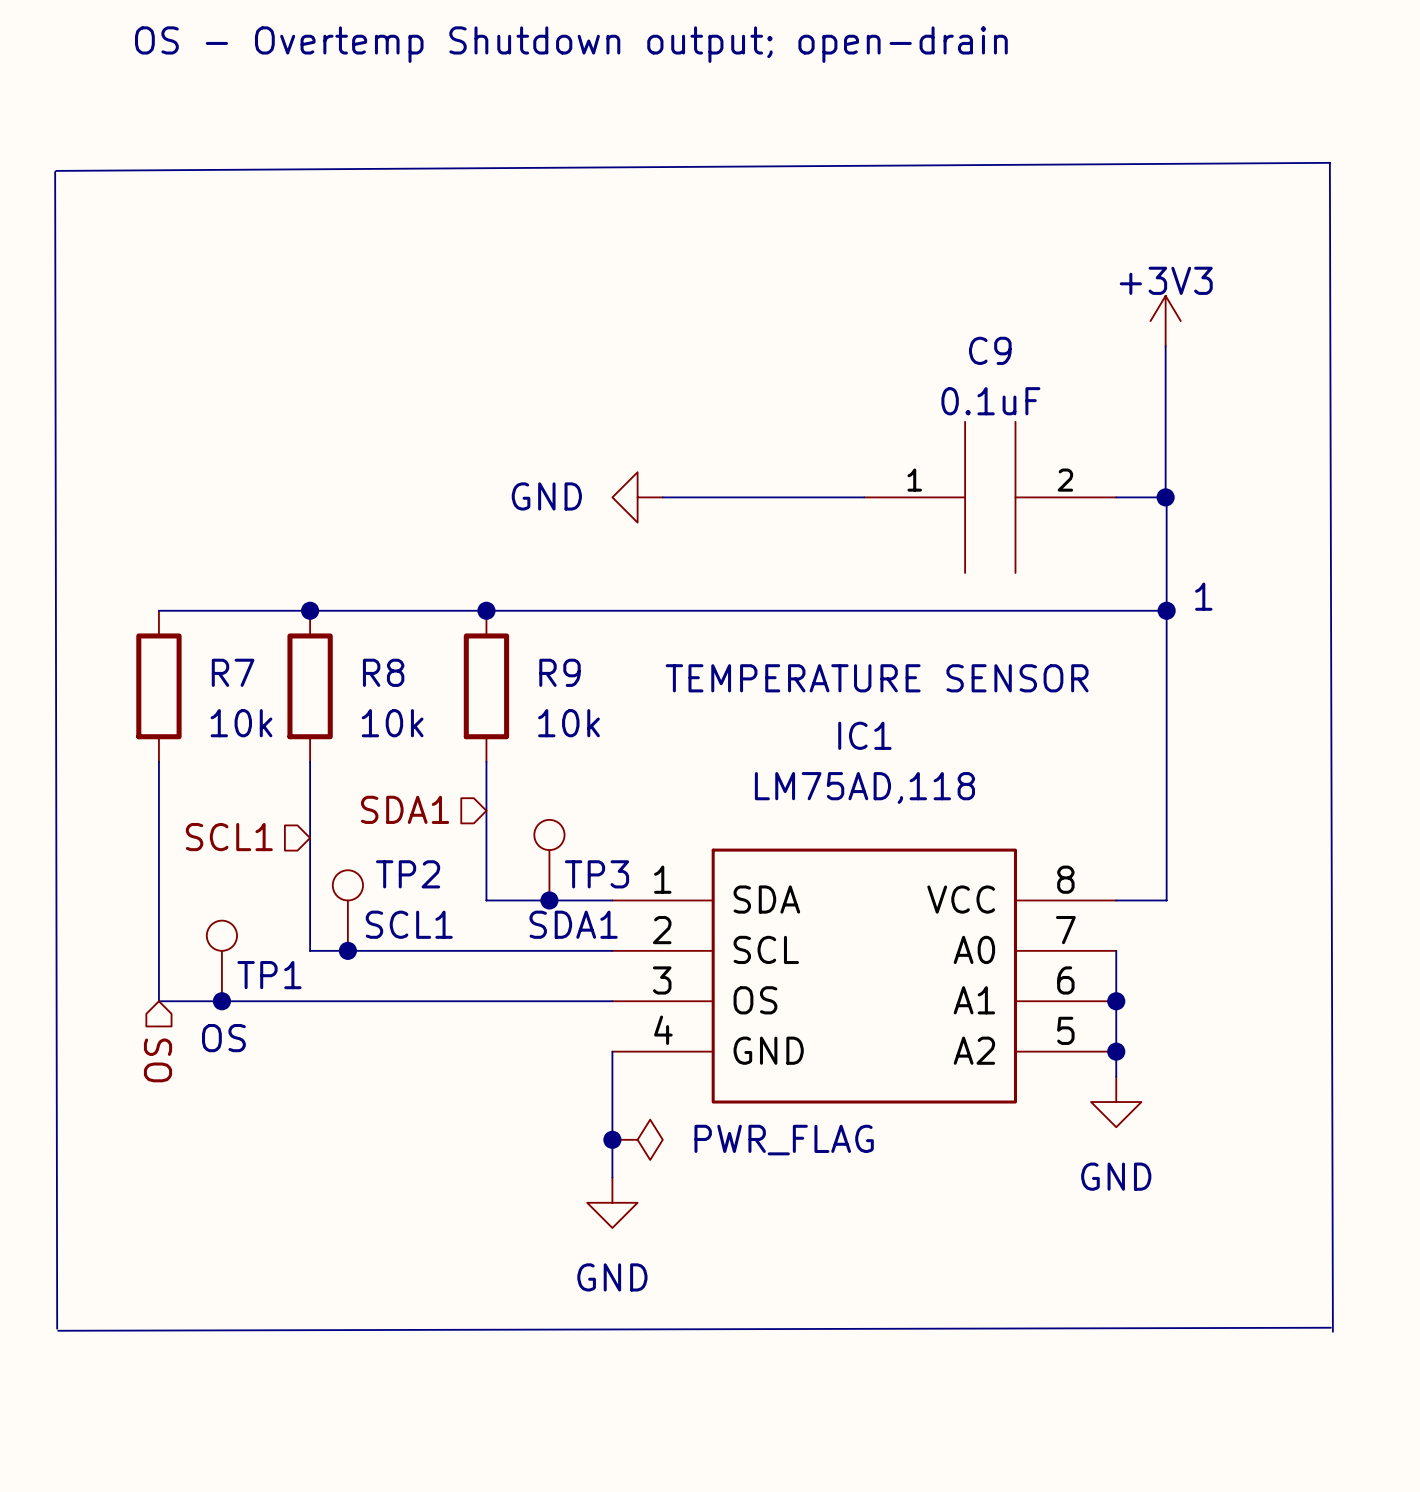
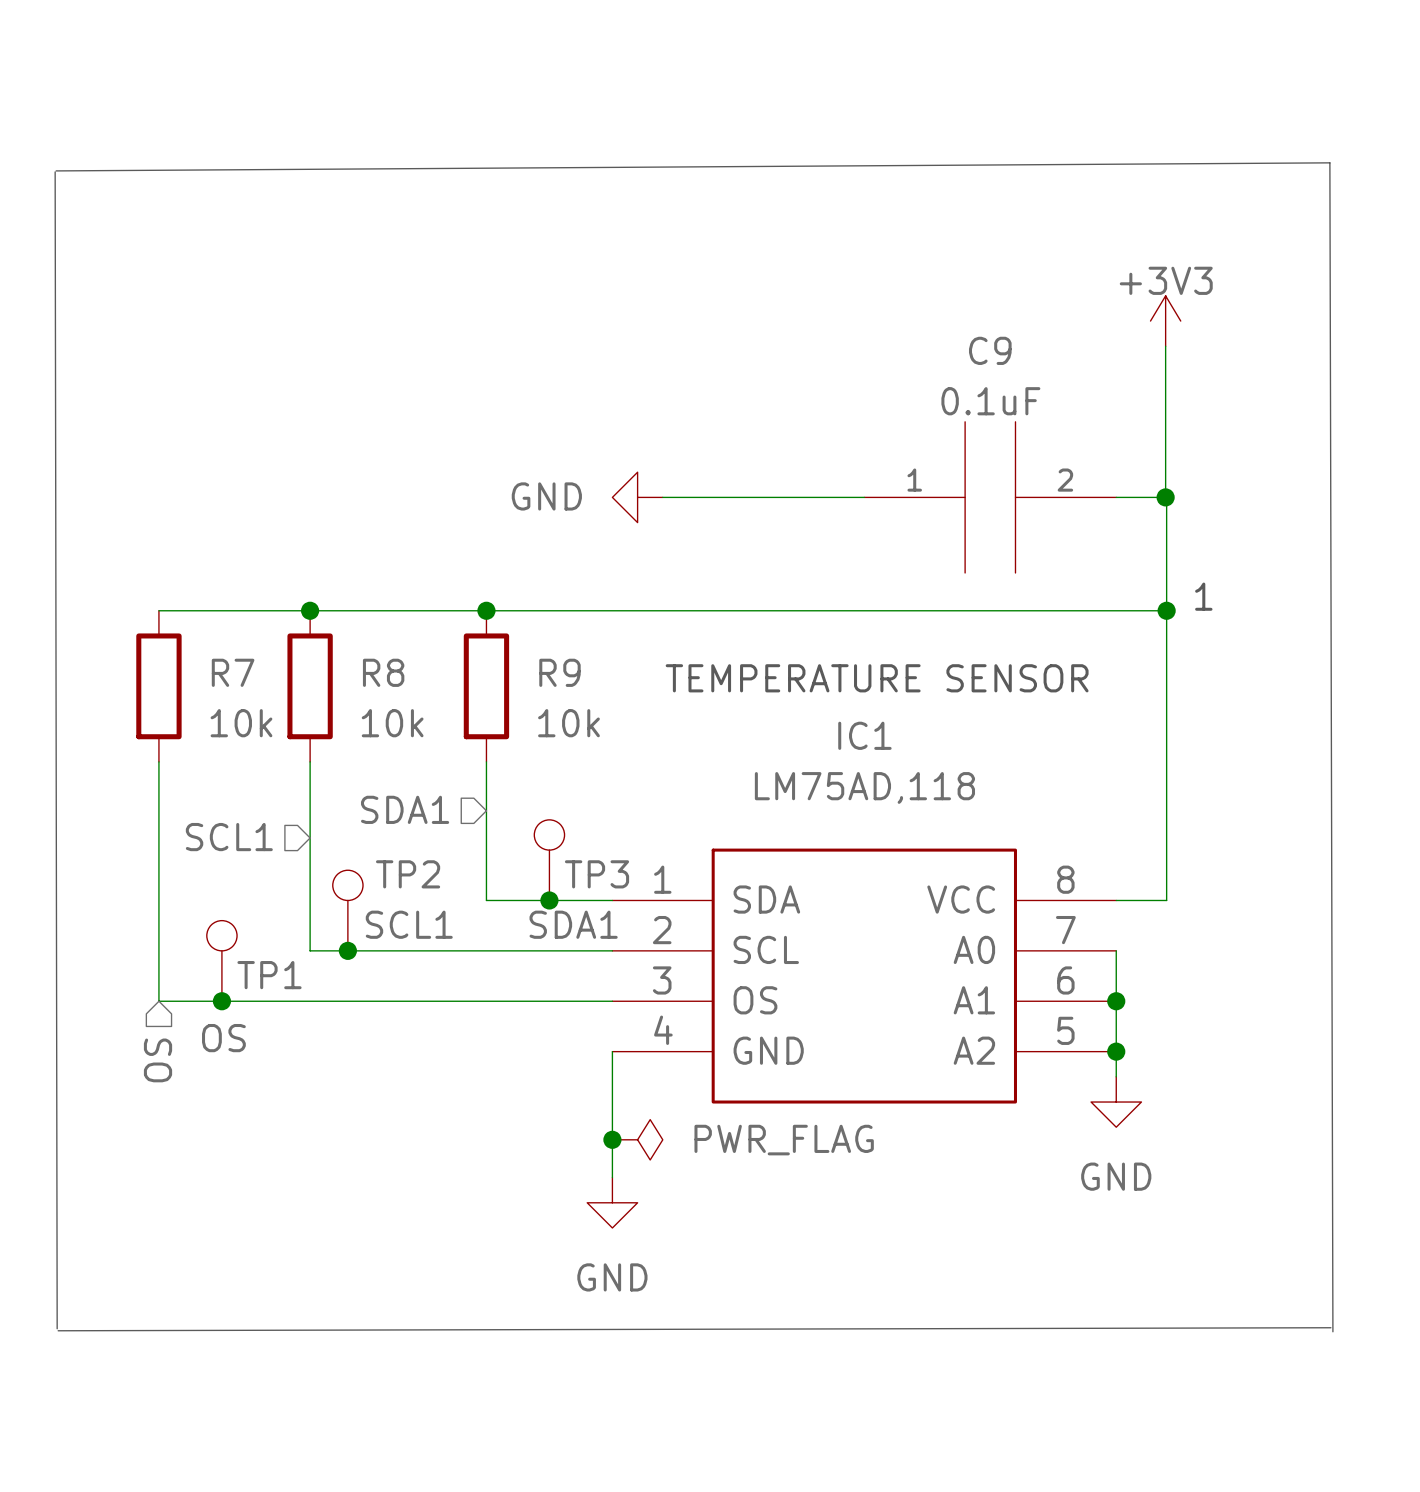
text: OS - Overtemp Shutdown output; open-drain (571, 44) -> none

